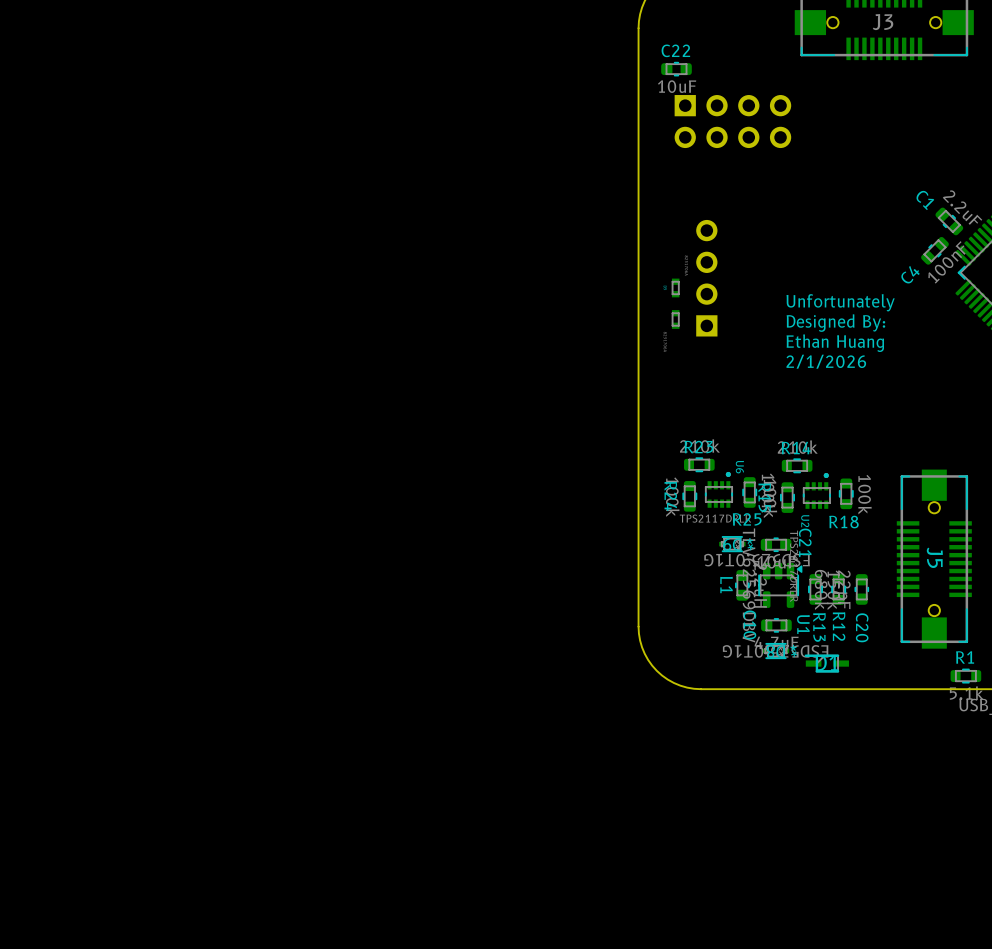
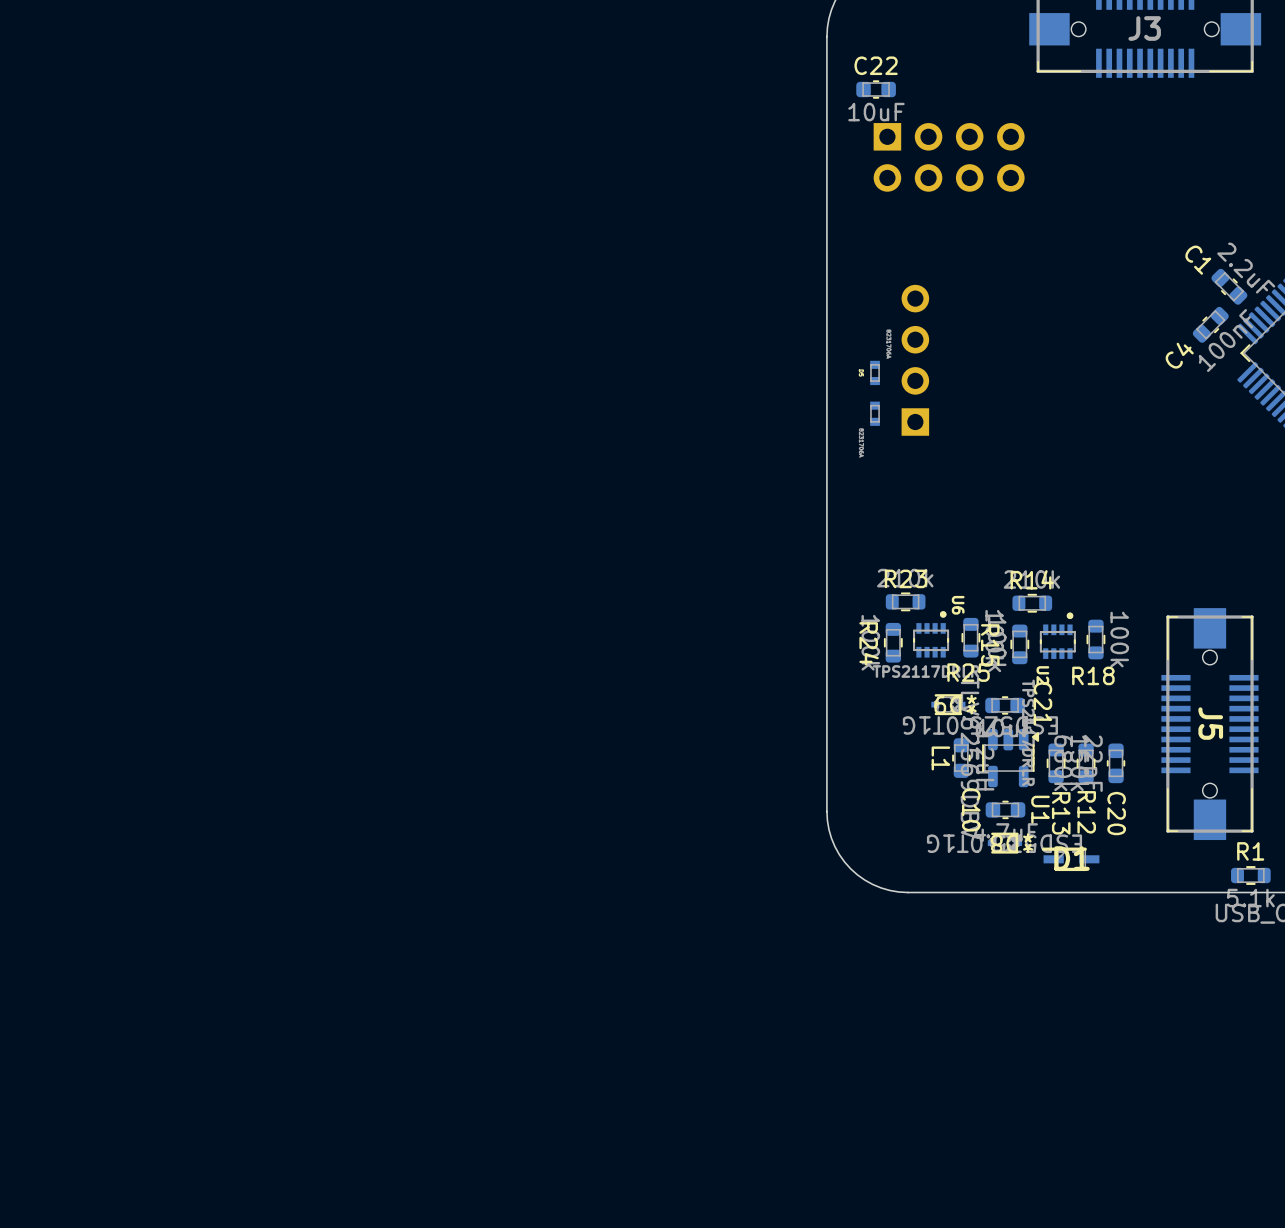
text: Unfortunately (840, 302) -> none
text: Designed By: (835, 323) -> none
text: Ethan Huang (835, 343) -> none
text: 2/1/2026 (826, 361) -> none

